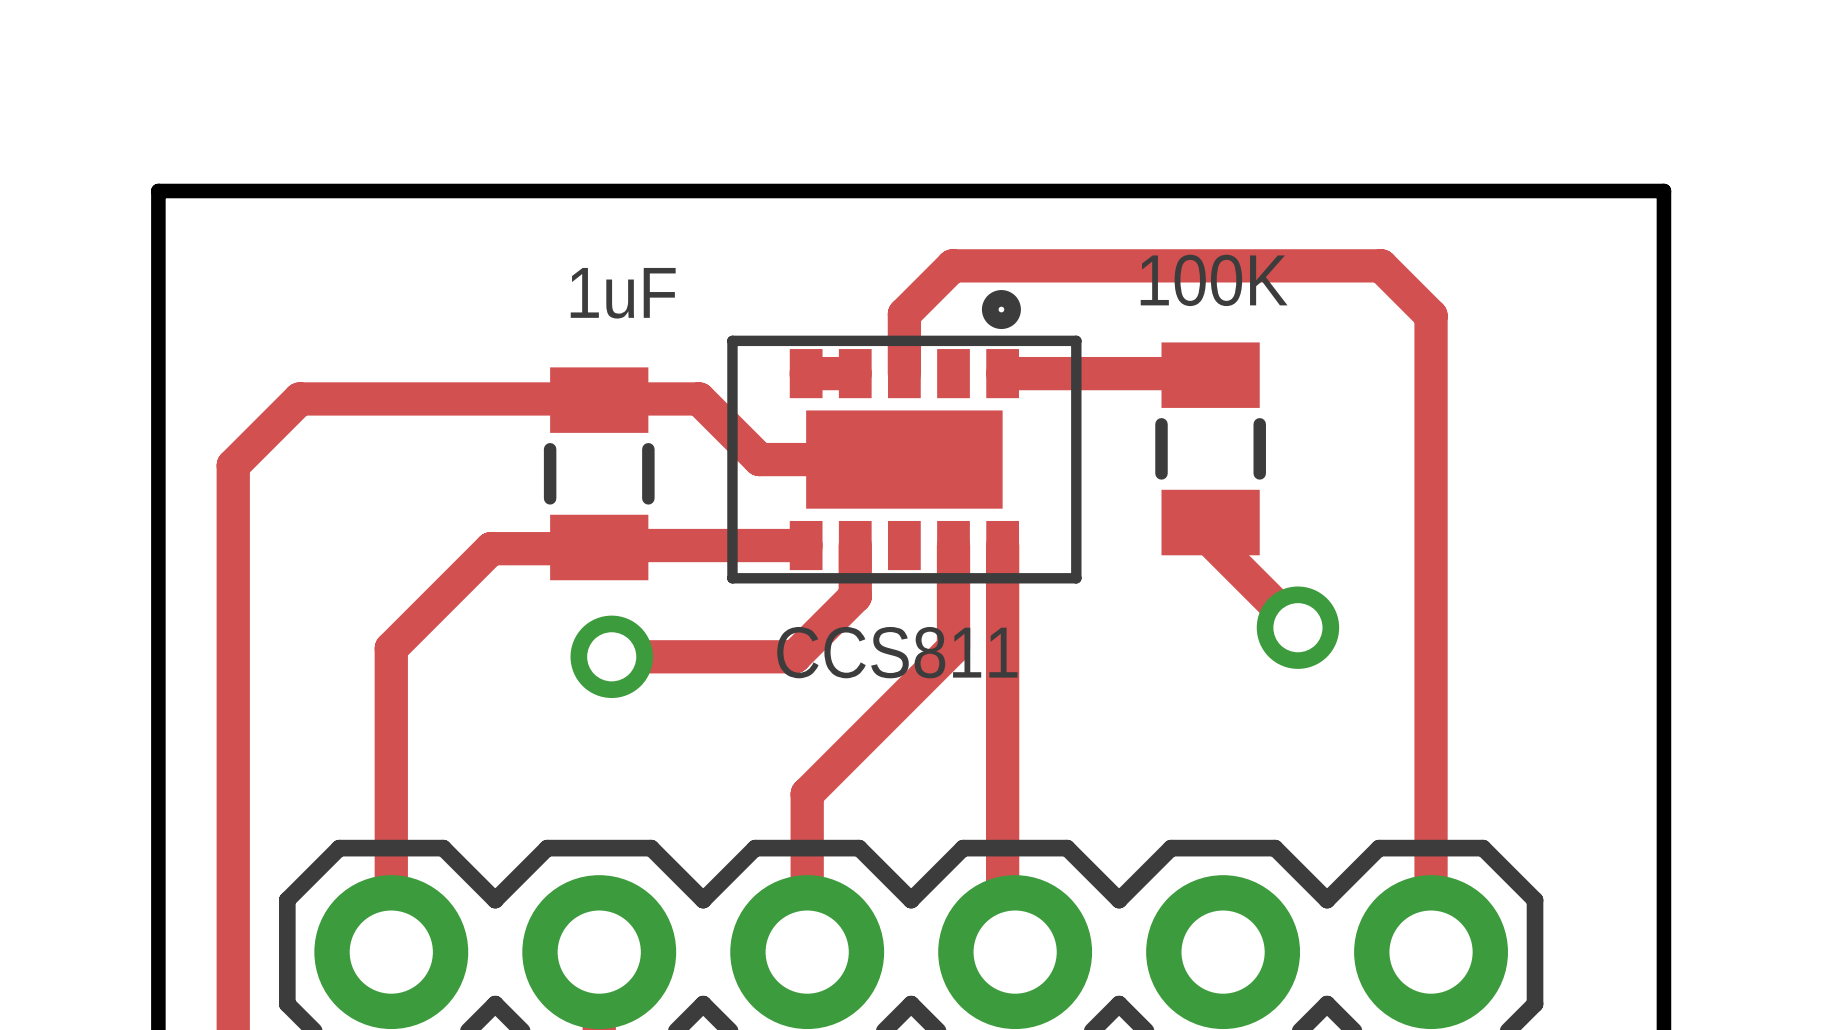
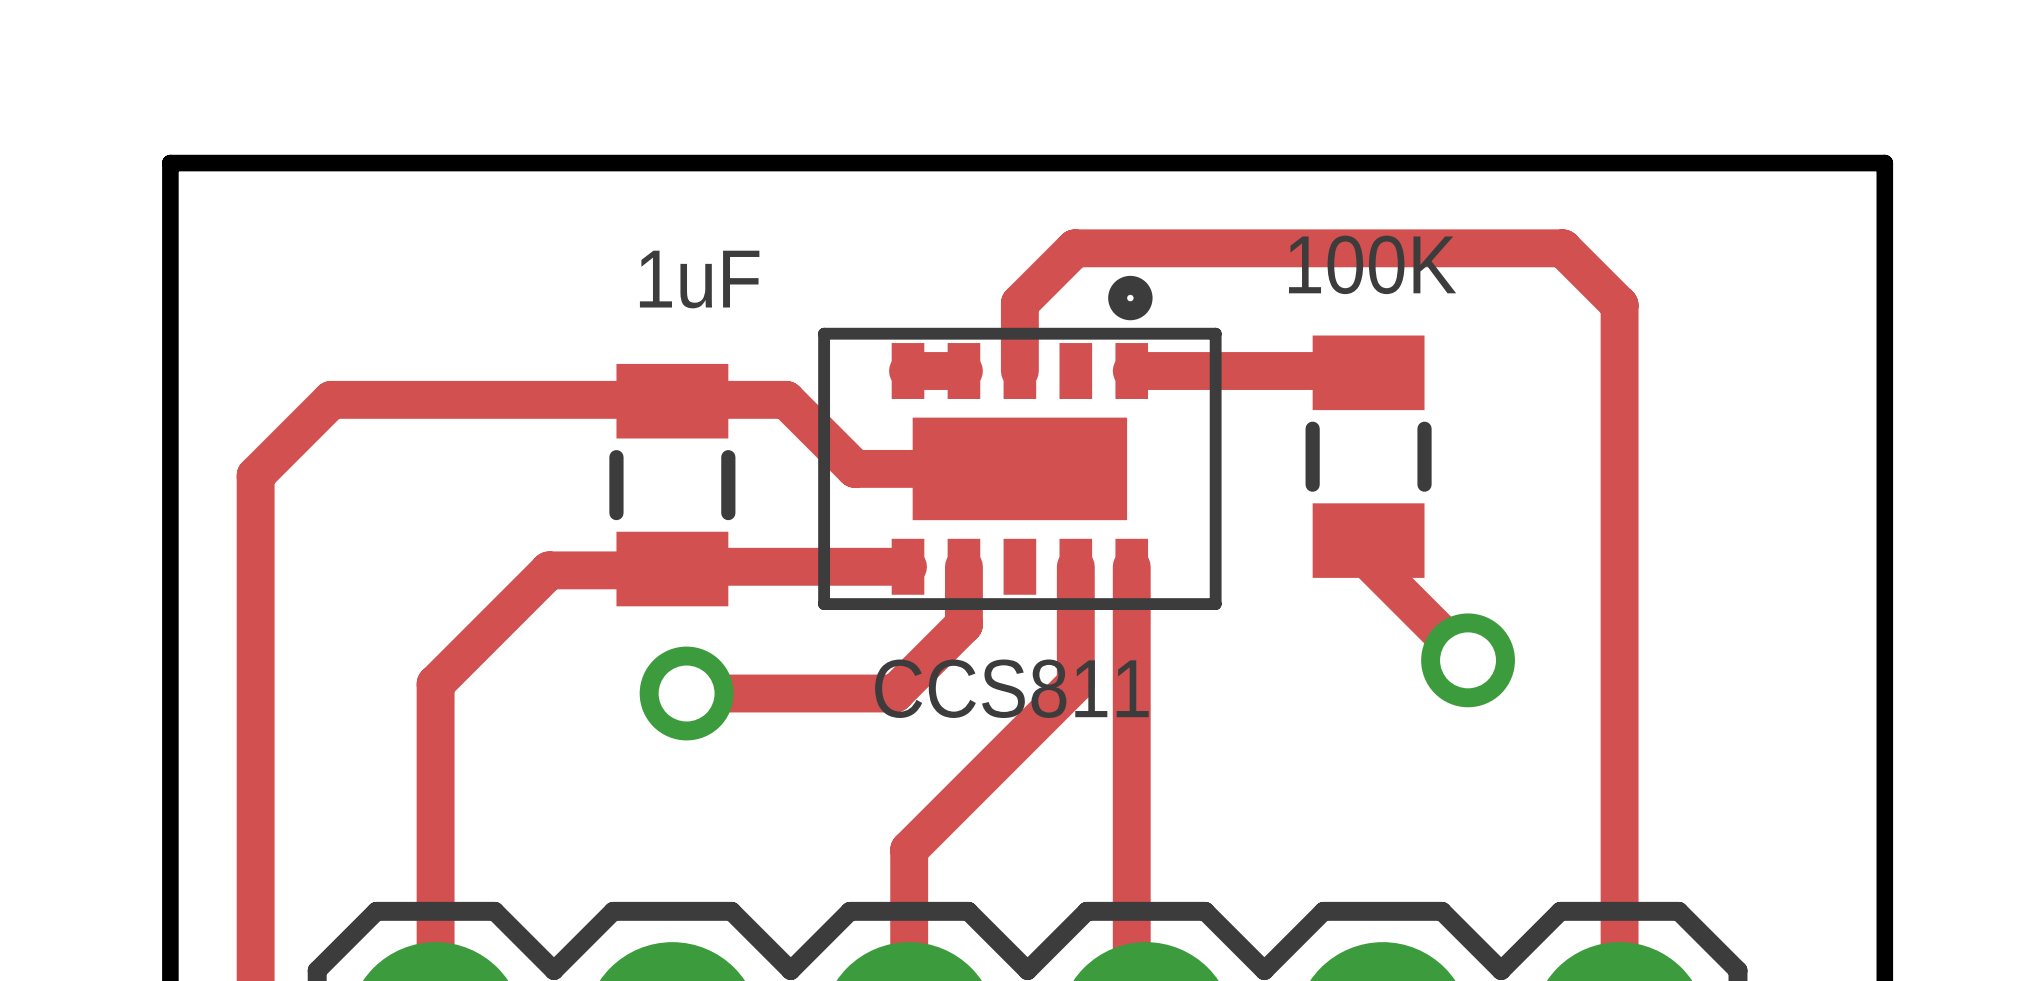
part footprint: [727, 290, 1082, 584] -> [818, 275, 1222, 611]

